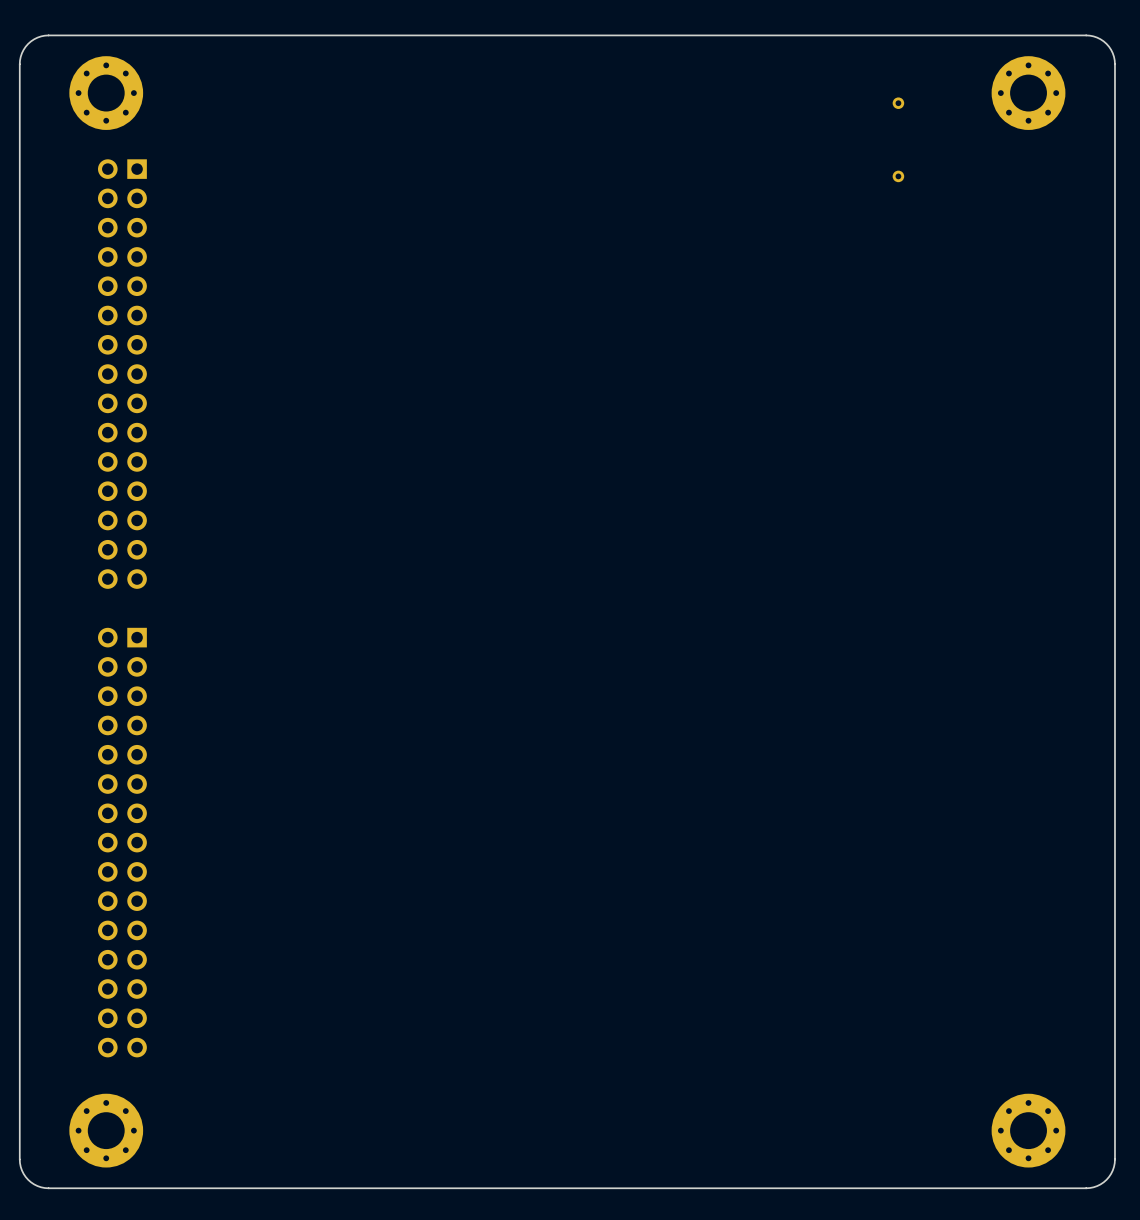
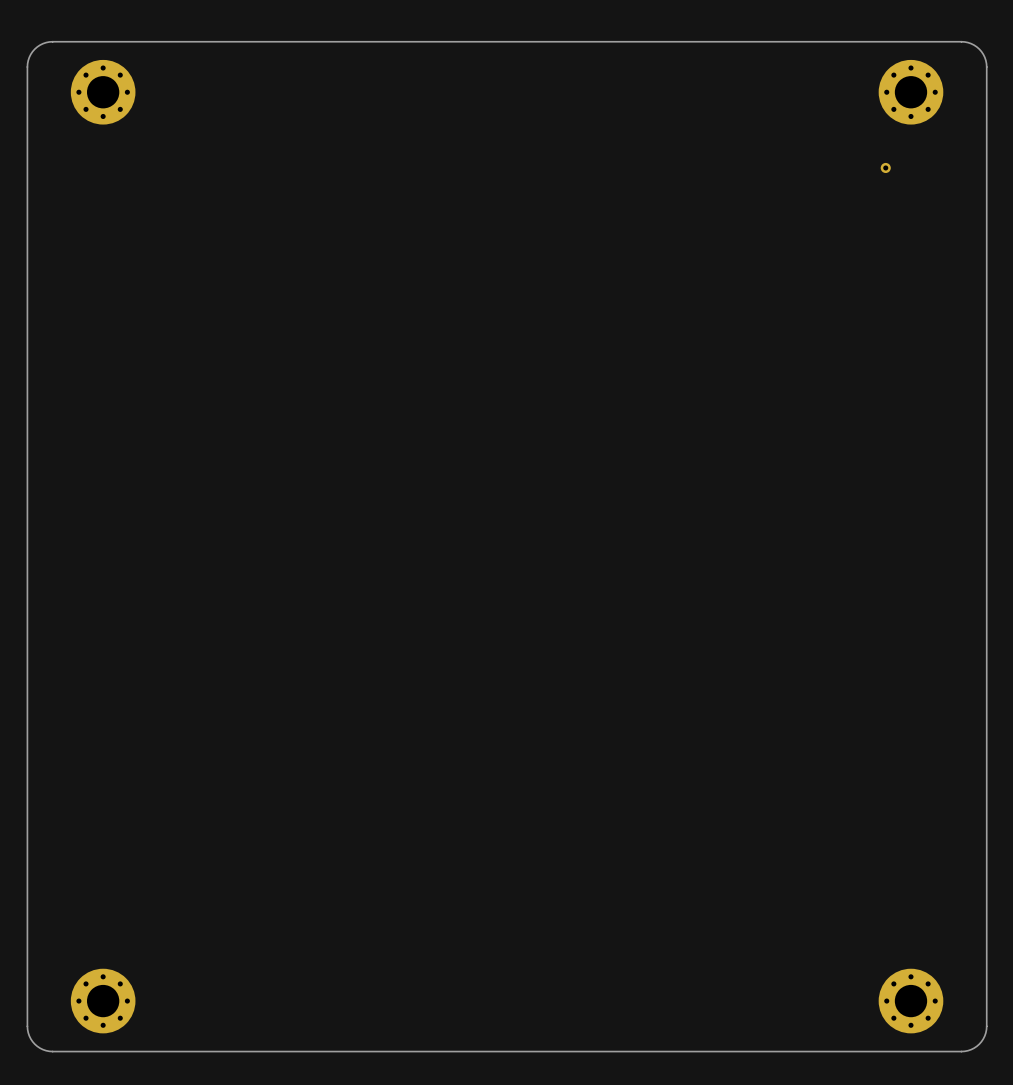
part: (898, 103) -> none
part: (898, 176) -> none
part: none -> (885, 167)
part: (122, 374) -> none
part: (122, 842) -> none

